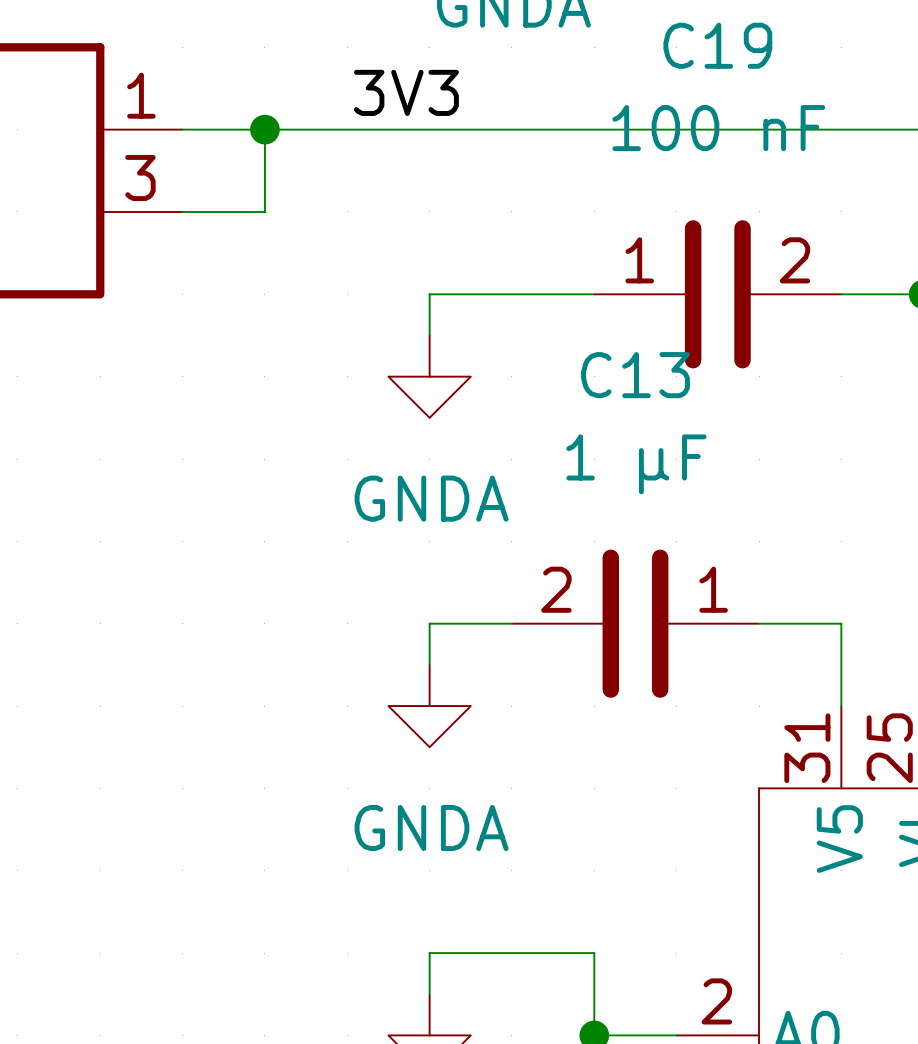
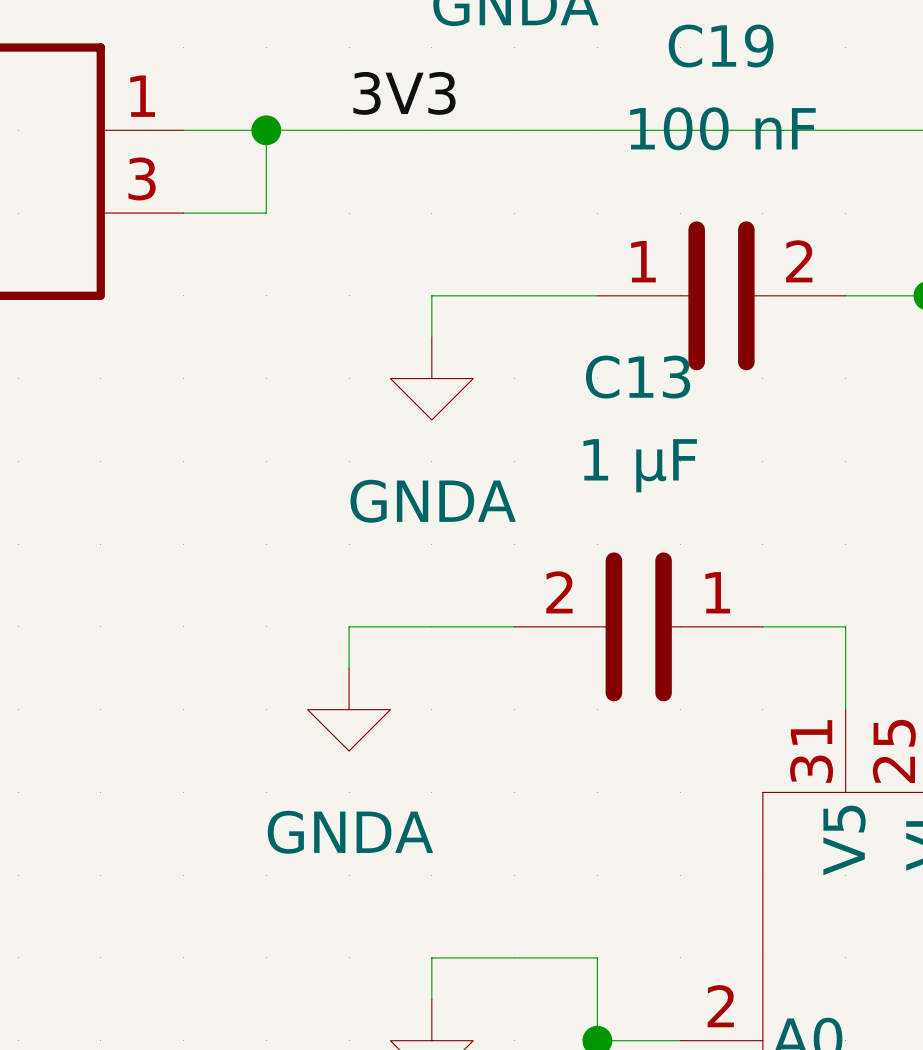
wire: (429, 623) (429, 664) -> (431, 626) (349, 626) (349, 668)
power symbol position: GNDA (429, 706) -> GNDA (349, 709)

